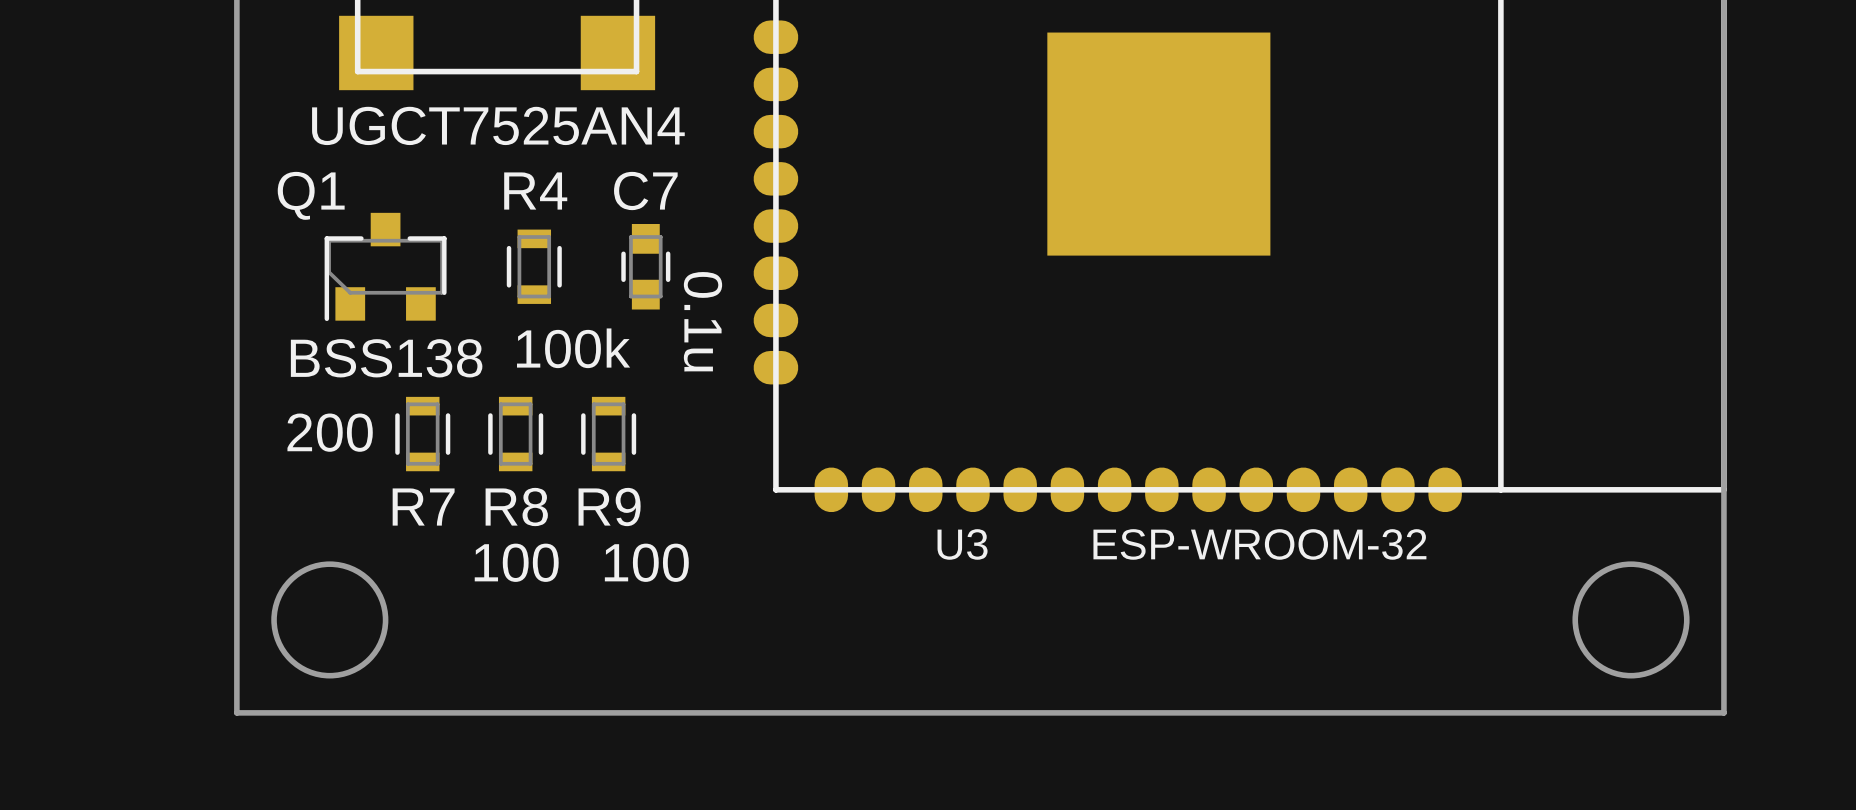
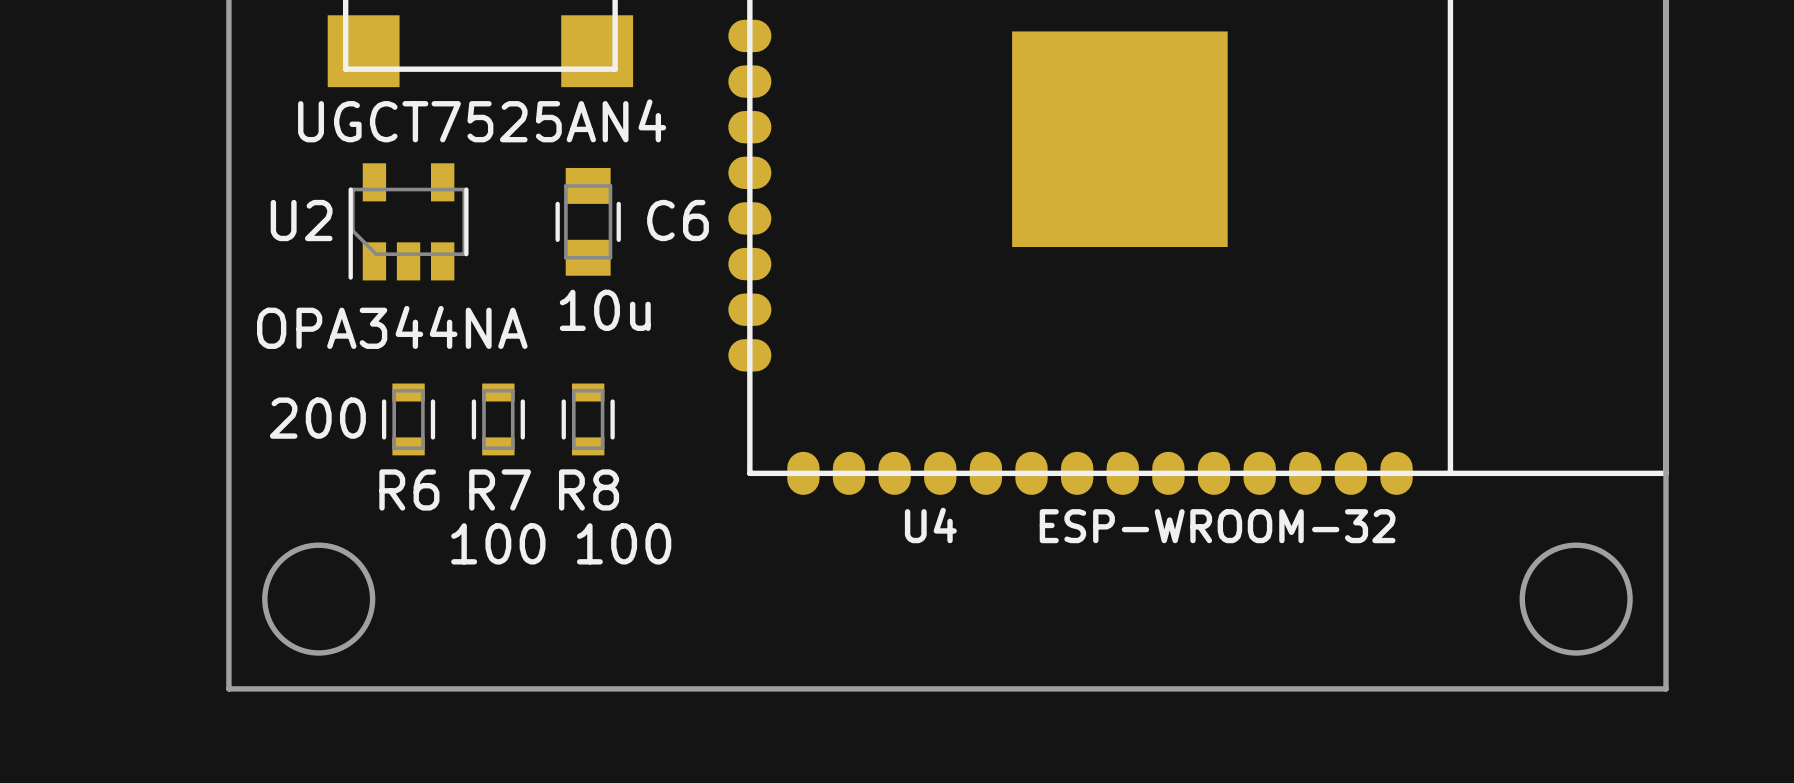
U2: none -> OPA344NA (408, 221)
C6: none -> 10u (588, 221)
Q1: BSS138 (385, 266) -> none
R4: 100k (534, 266) -> none
C7: 0.1u (645, 266) -> none
R7 name: R7 (423, 507) -> R6 (409, 489)
R8 name: R8 (516, 507) -> R7 (500, 489)
R9 name: R9 (609, 507) -> R8 (589, 489)
U3 name: U3 (962, 544) -> U4 (930, 525)

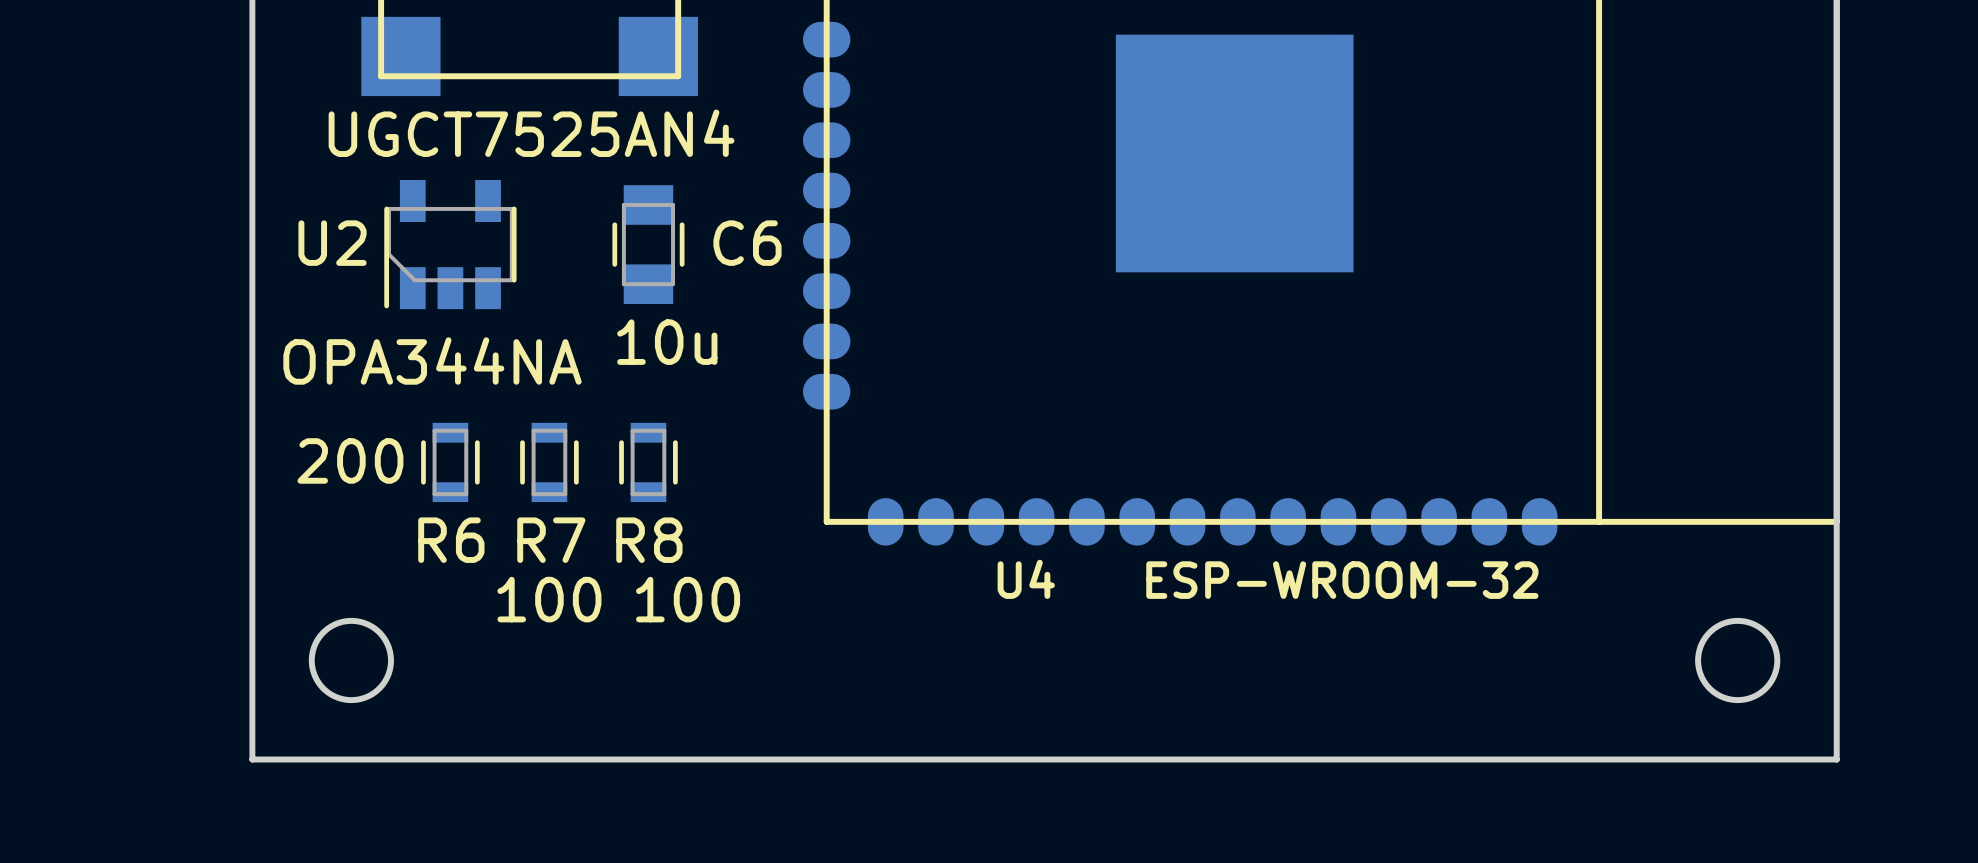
round board edge size: [262, 542, 376, 656] -> [308, 617, 394, 704]
round board edge size: [1519, 542, 1633, 656] -> [1695, 617, 1781, 704]

